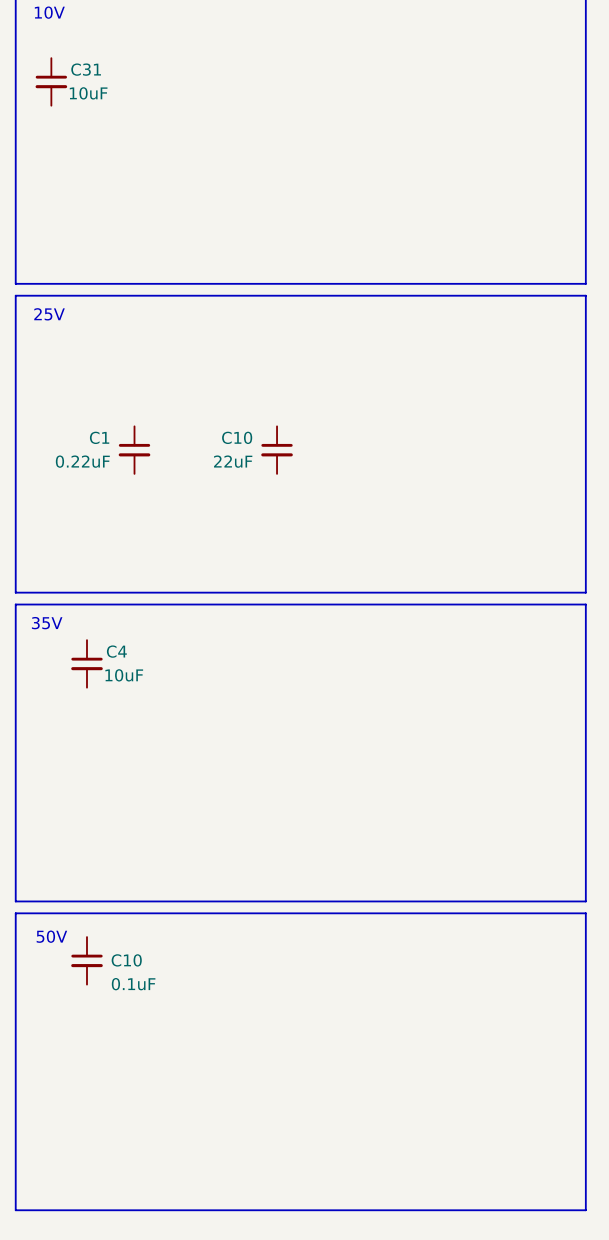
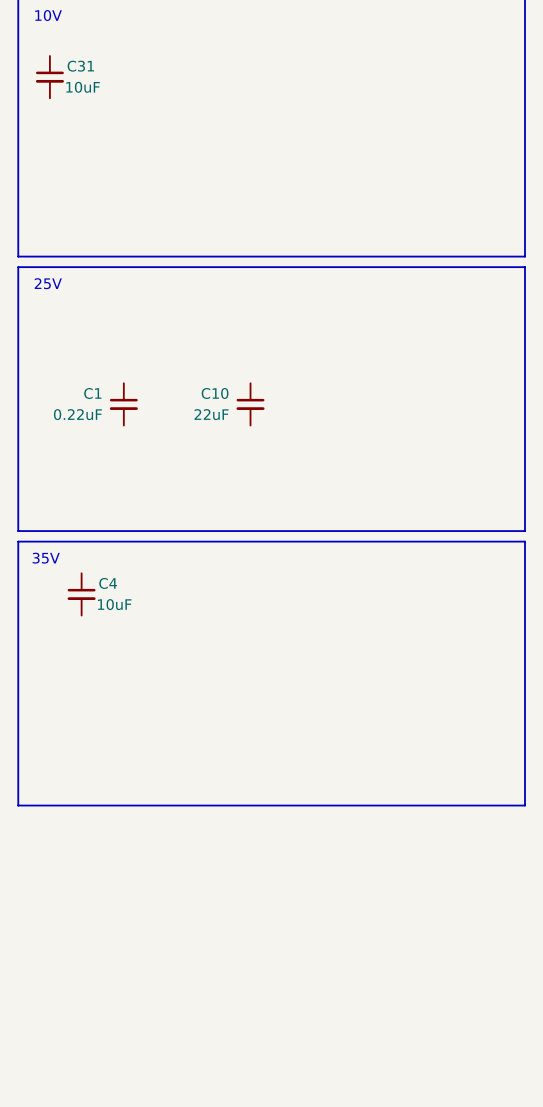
line: (15, 913) (585, 913) (585, 1210) (15, 1210) (15, 913) -> none
text: 50V (51, 936) -> none
C10: 0.1uF (86, 960) -> none

